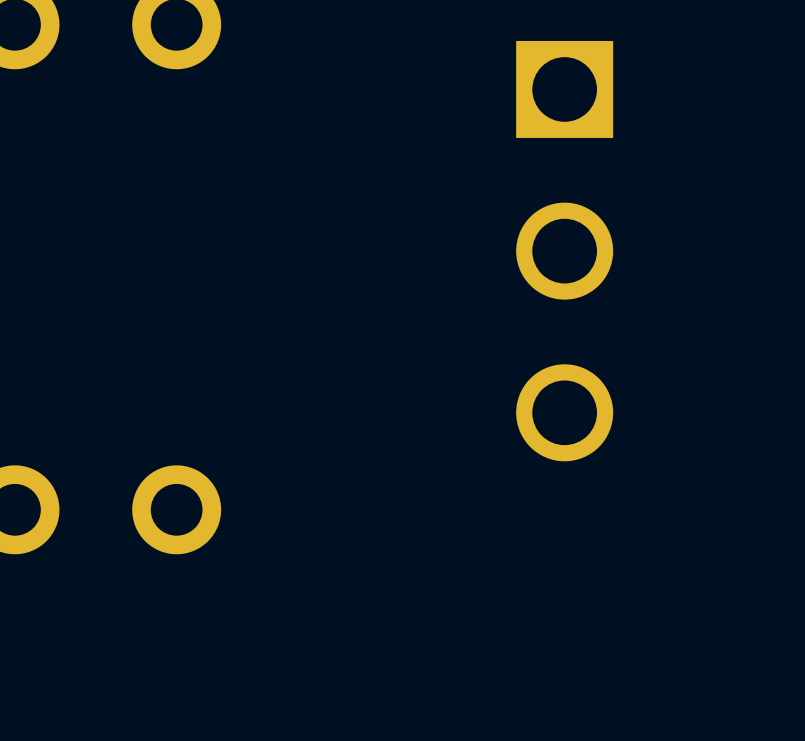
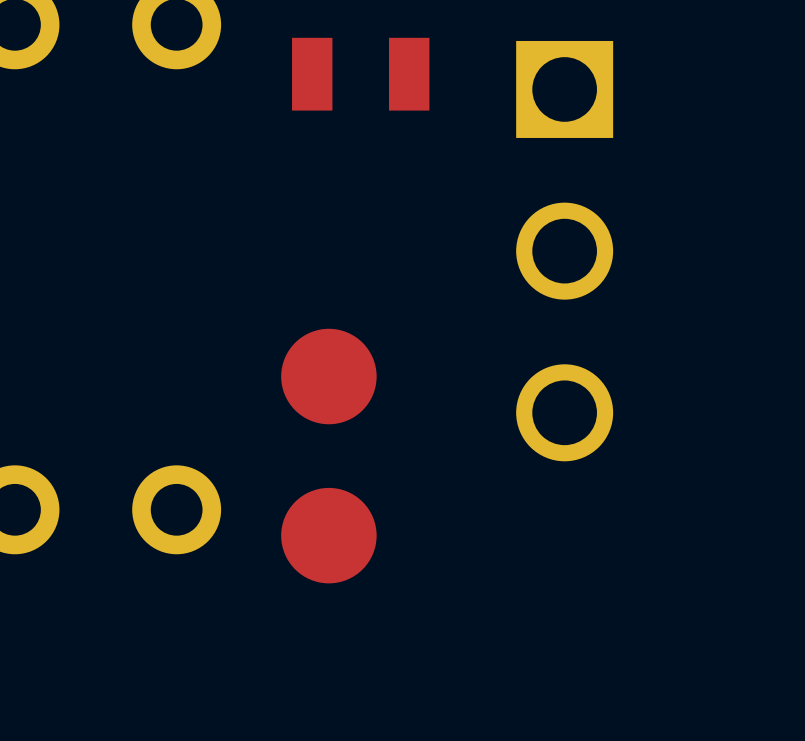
part: none -> (360, 74)
part: none -> (328, 376)
part: none -> (328, 535)

